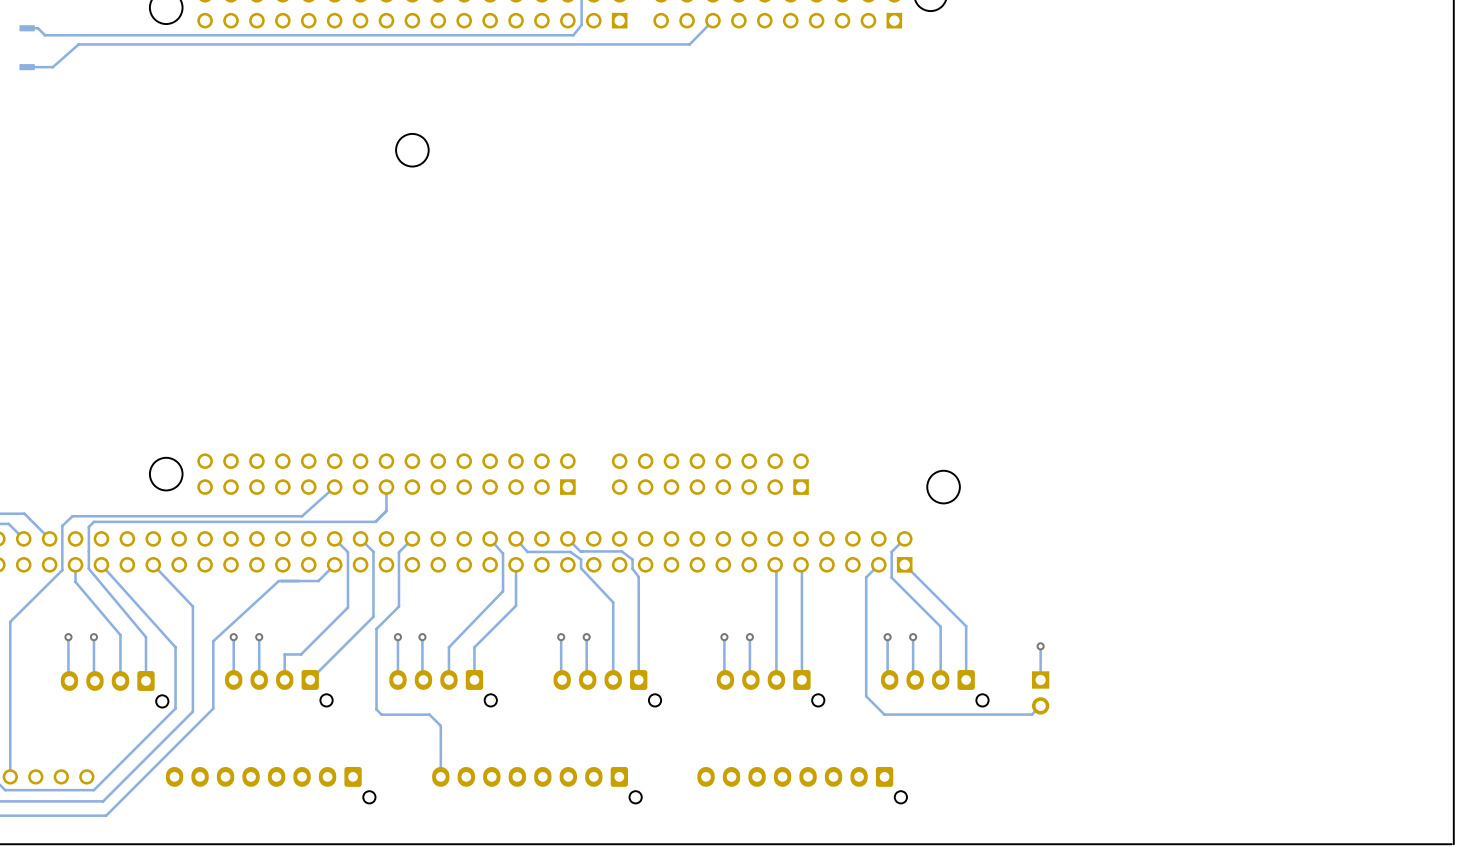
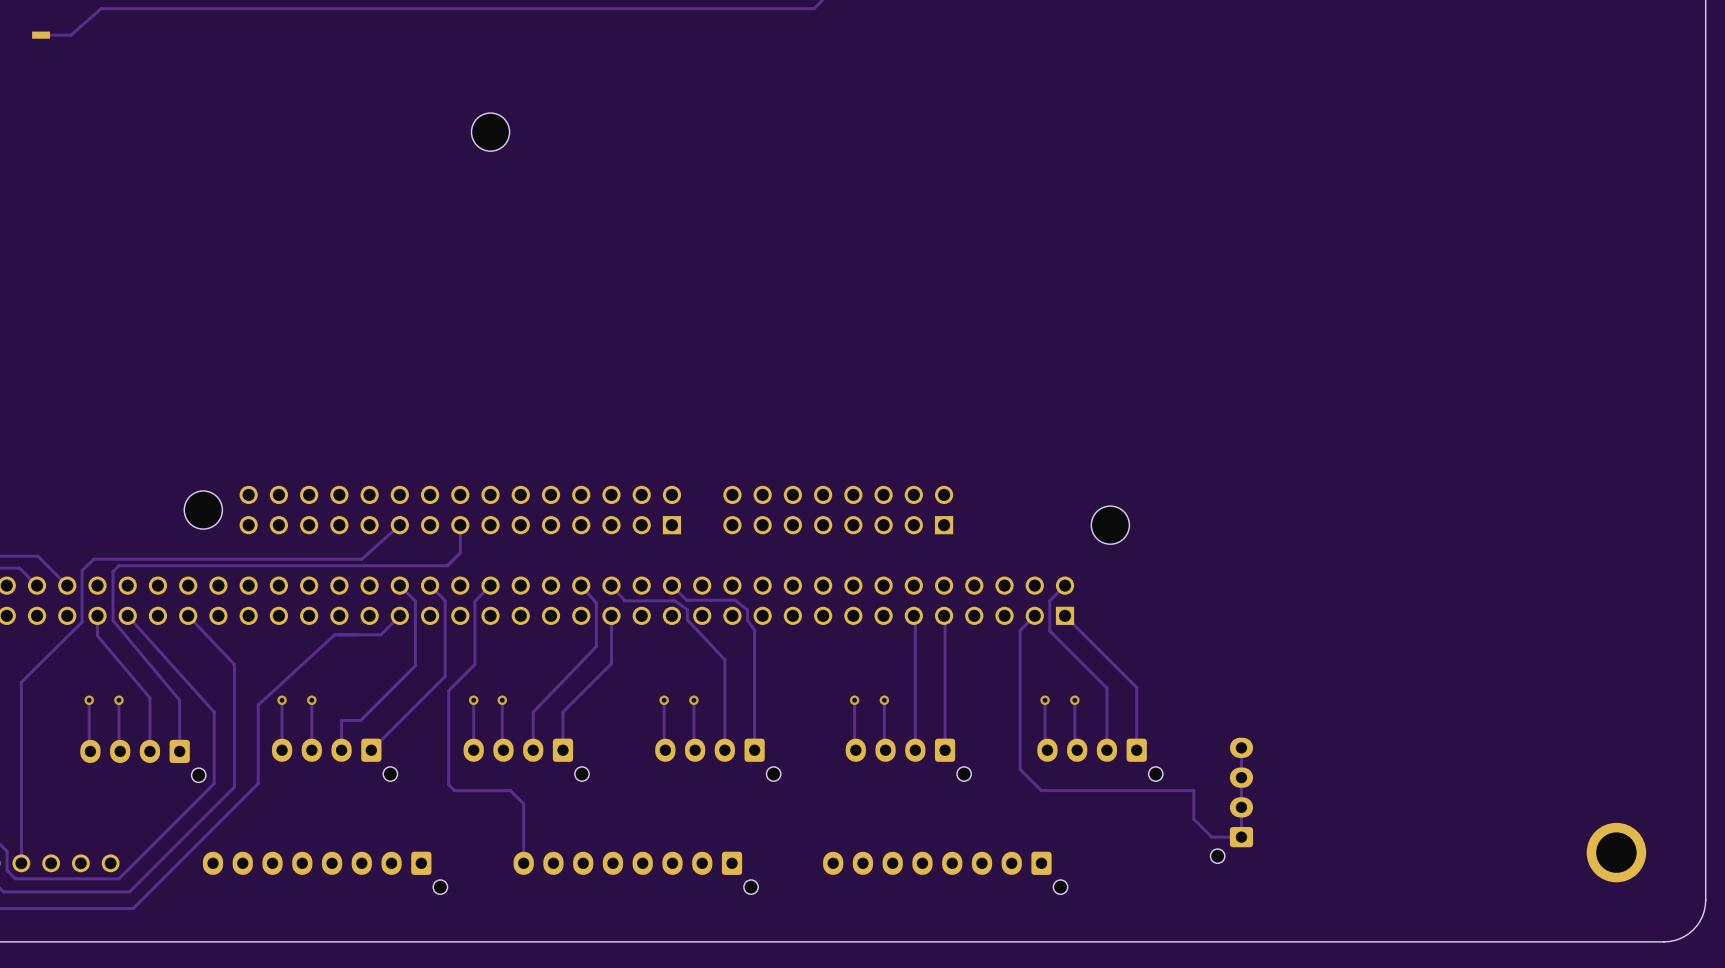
via: (1040, 646) -> none
track: (1040, 647) (1040, 679) -> none
part: (1040, 692) -> none
track: (1040, 705) (1031, 714) (1015, 714) -> (1241, 747) (1241, 837) (1211, 837) (1193, 819) (1193, 790)
part: none -> (1231, 800)
part: none -> (1616, 852)
board edge: (1453, 808) (1453, 844) -> (1705, 900) (1702, 916) (1693, 929) (1679, 938) (1664, 941)
board edge: (1451, 844) (1418, 844) -> none

